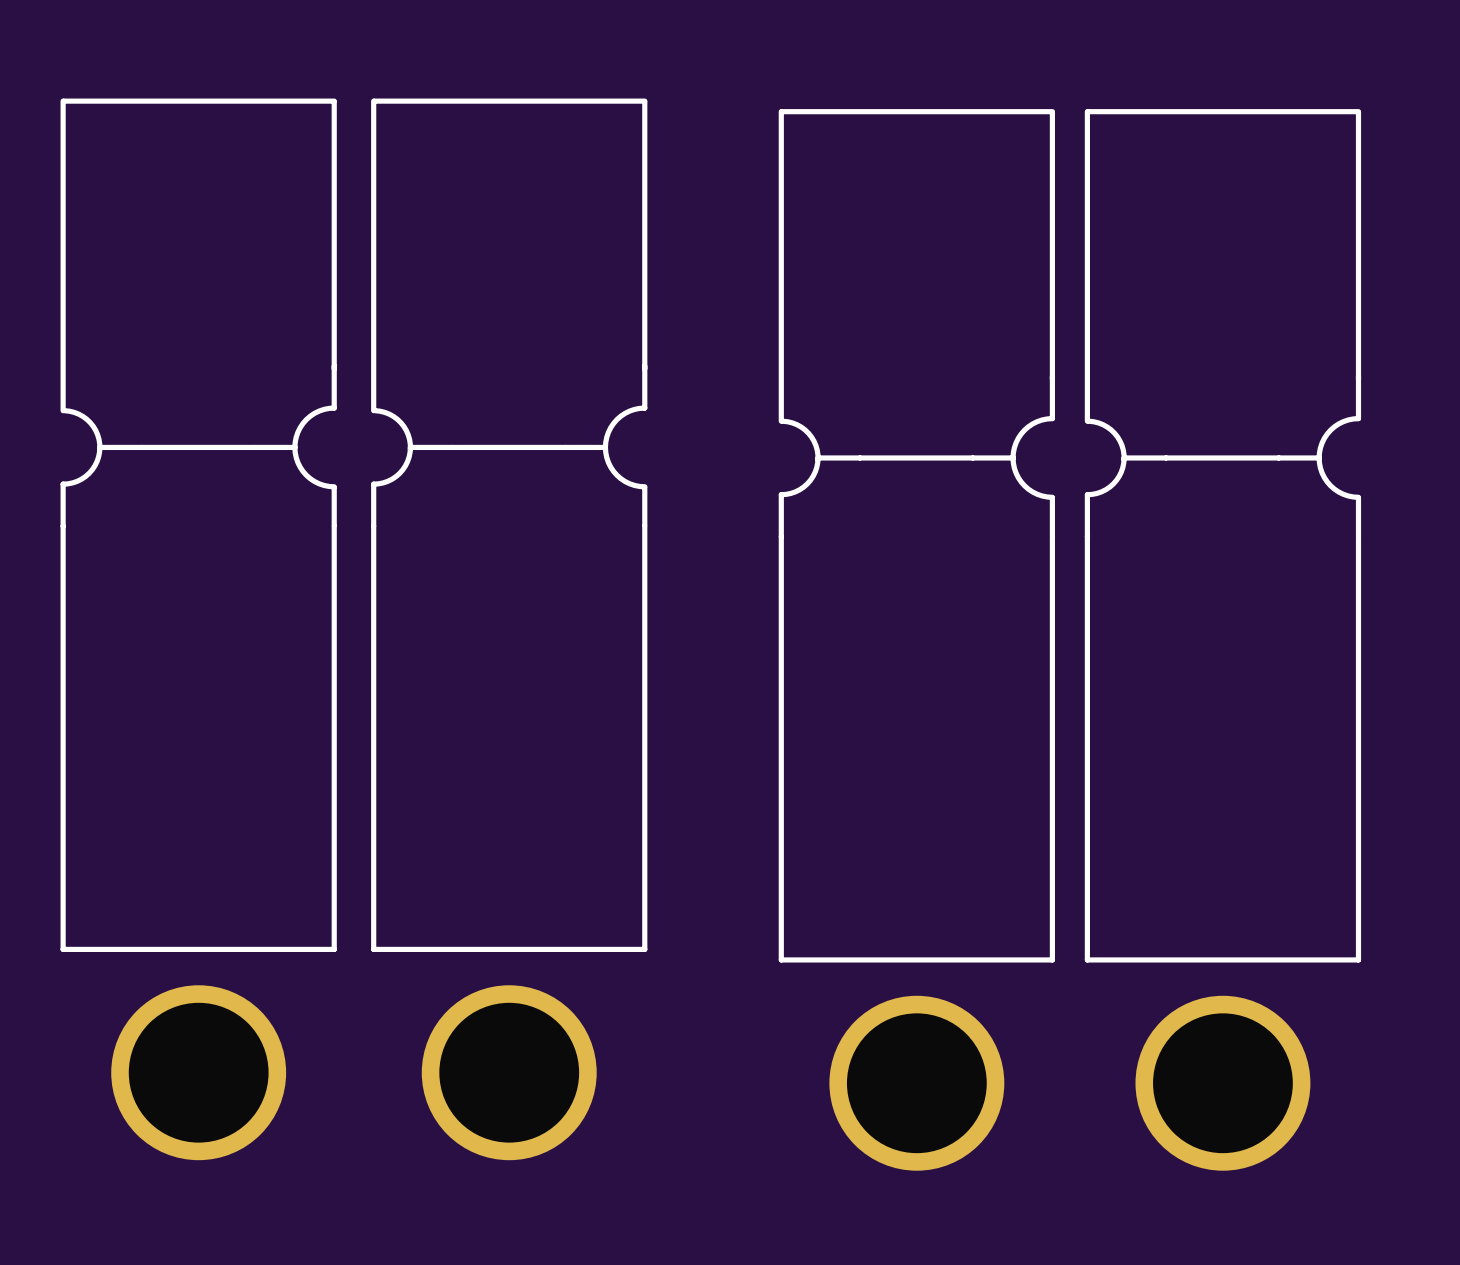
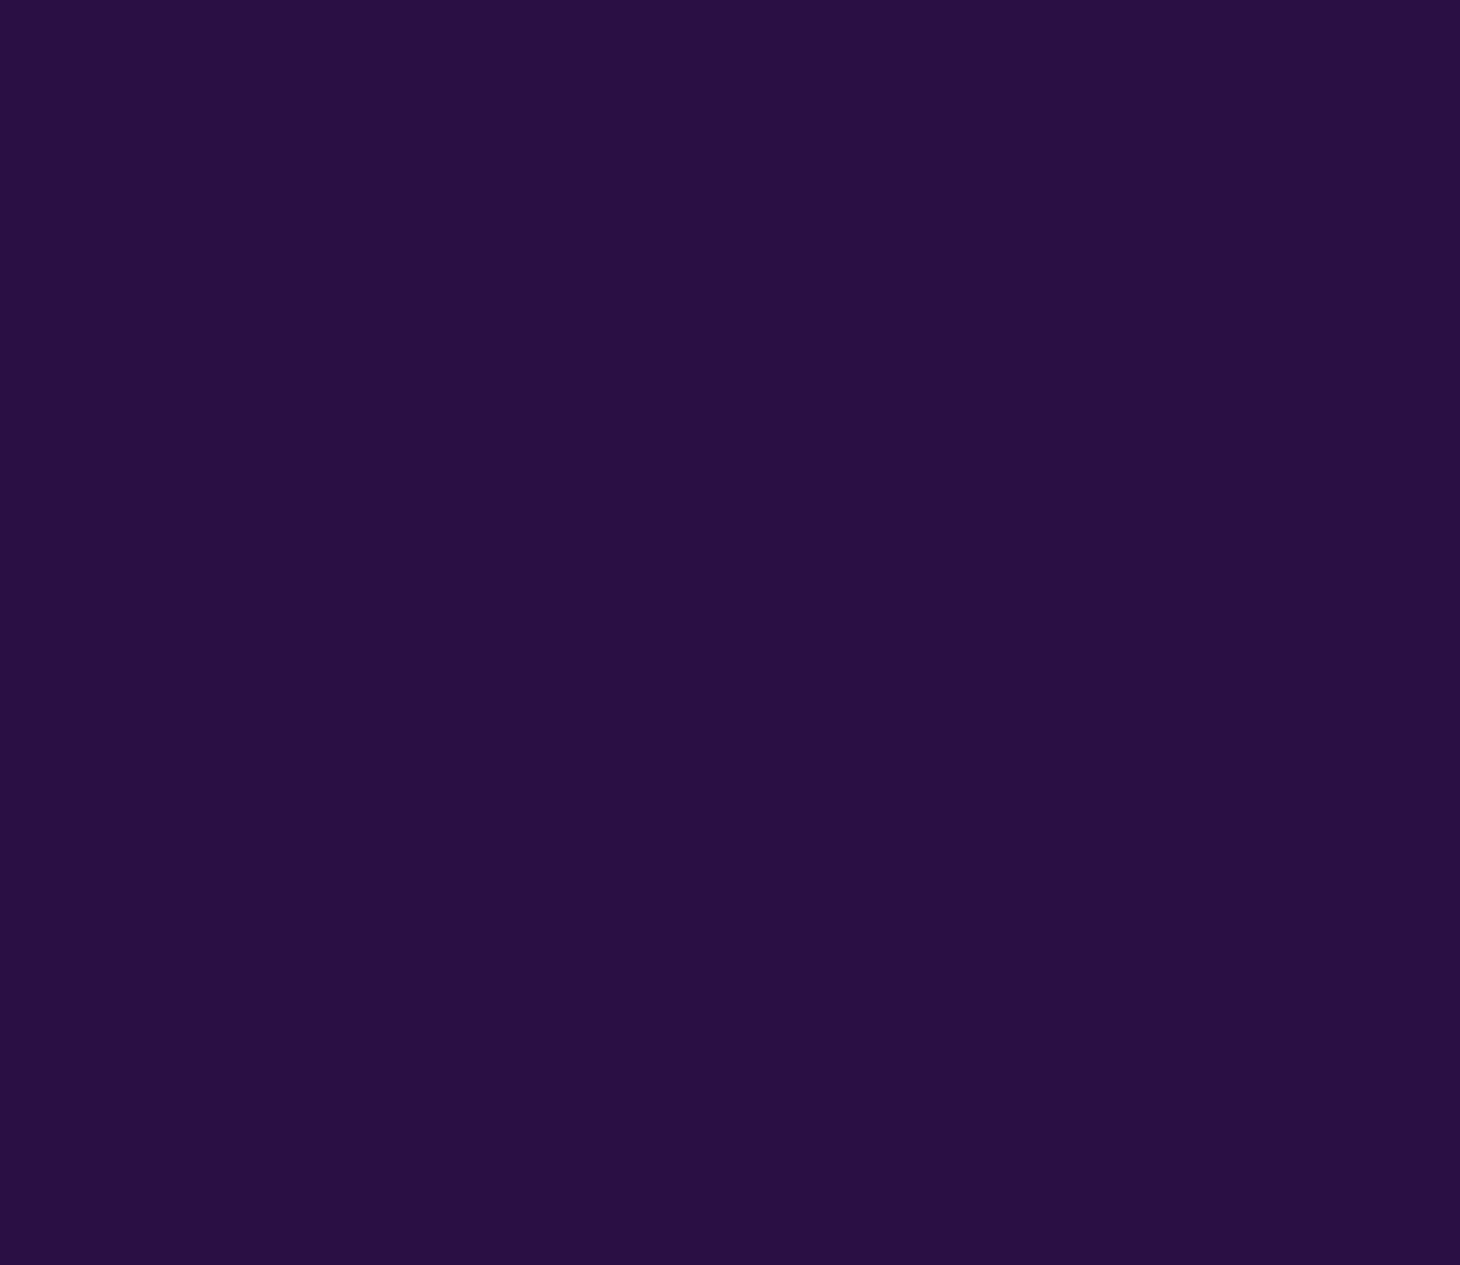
part: (198, 629) -> none
part: (509, 629) -> none
part: (916, 639) -> none
part: (1222, 639) -> none

